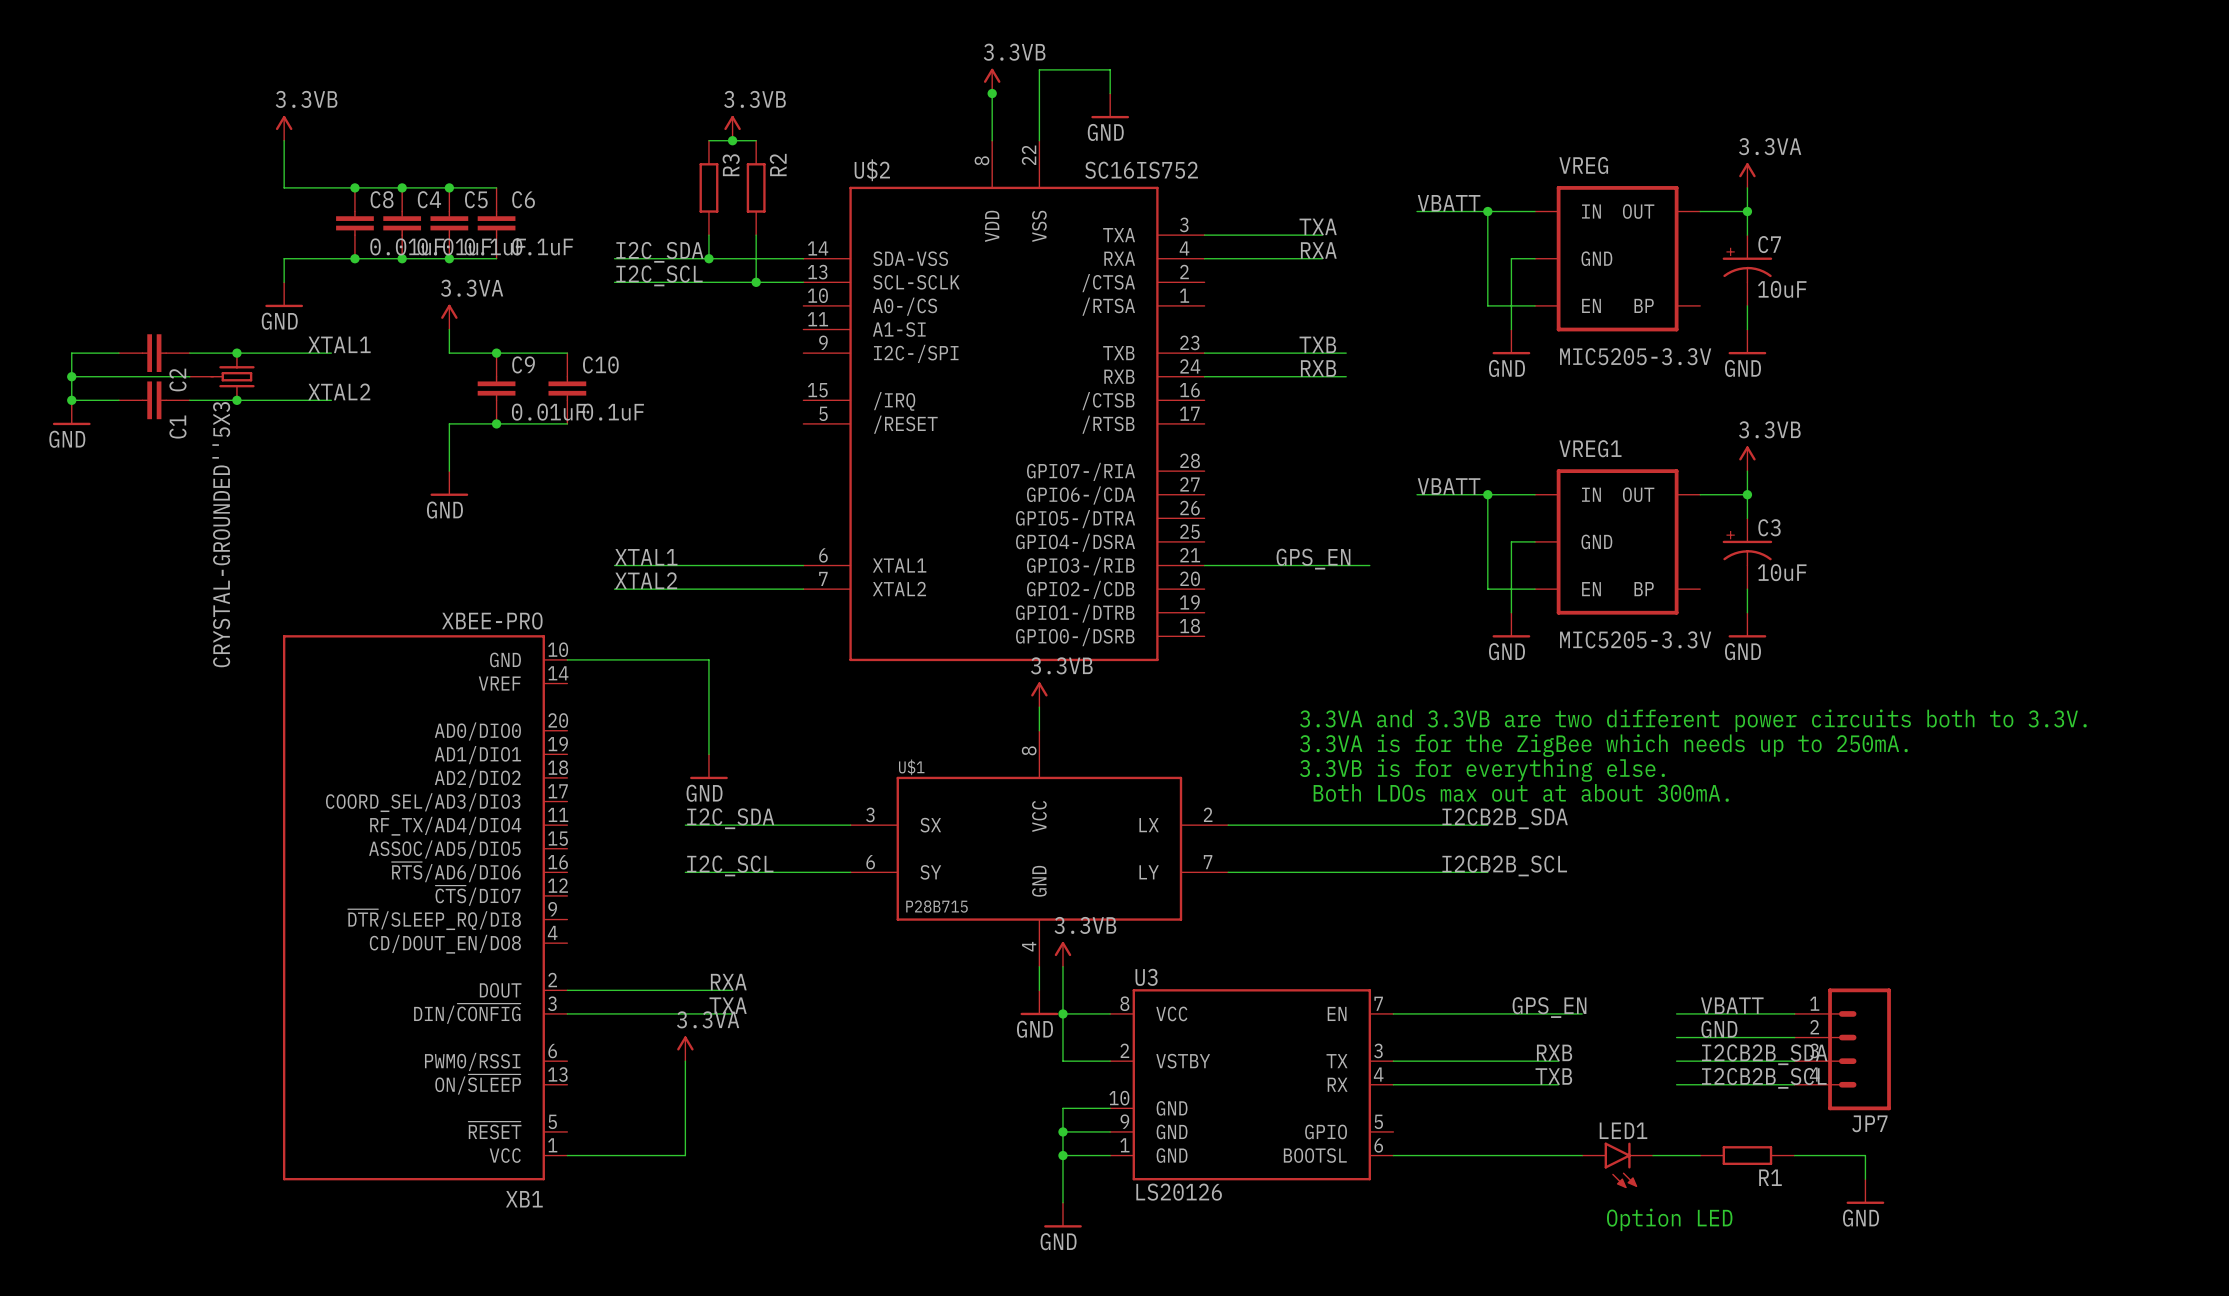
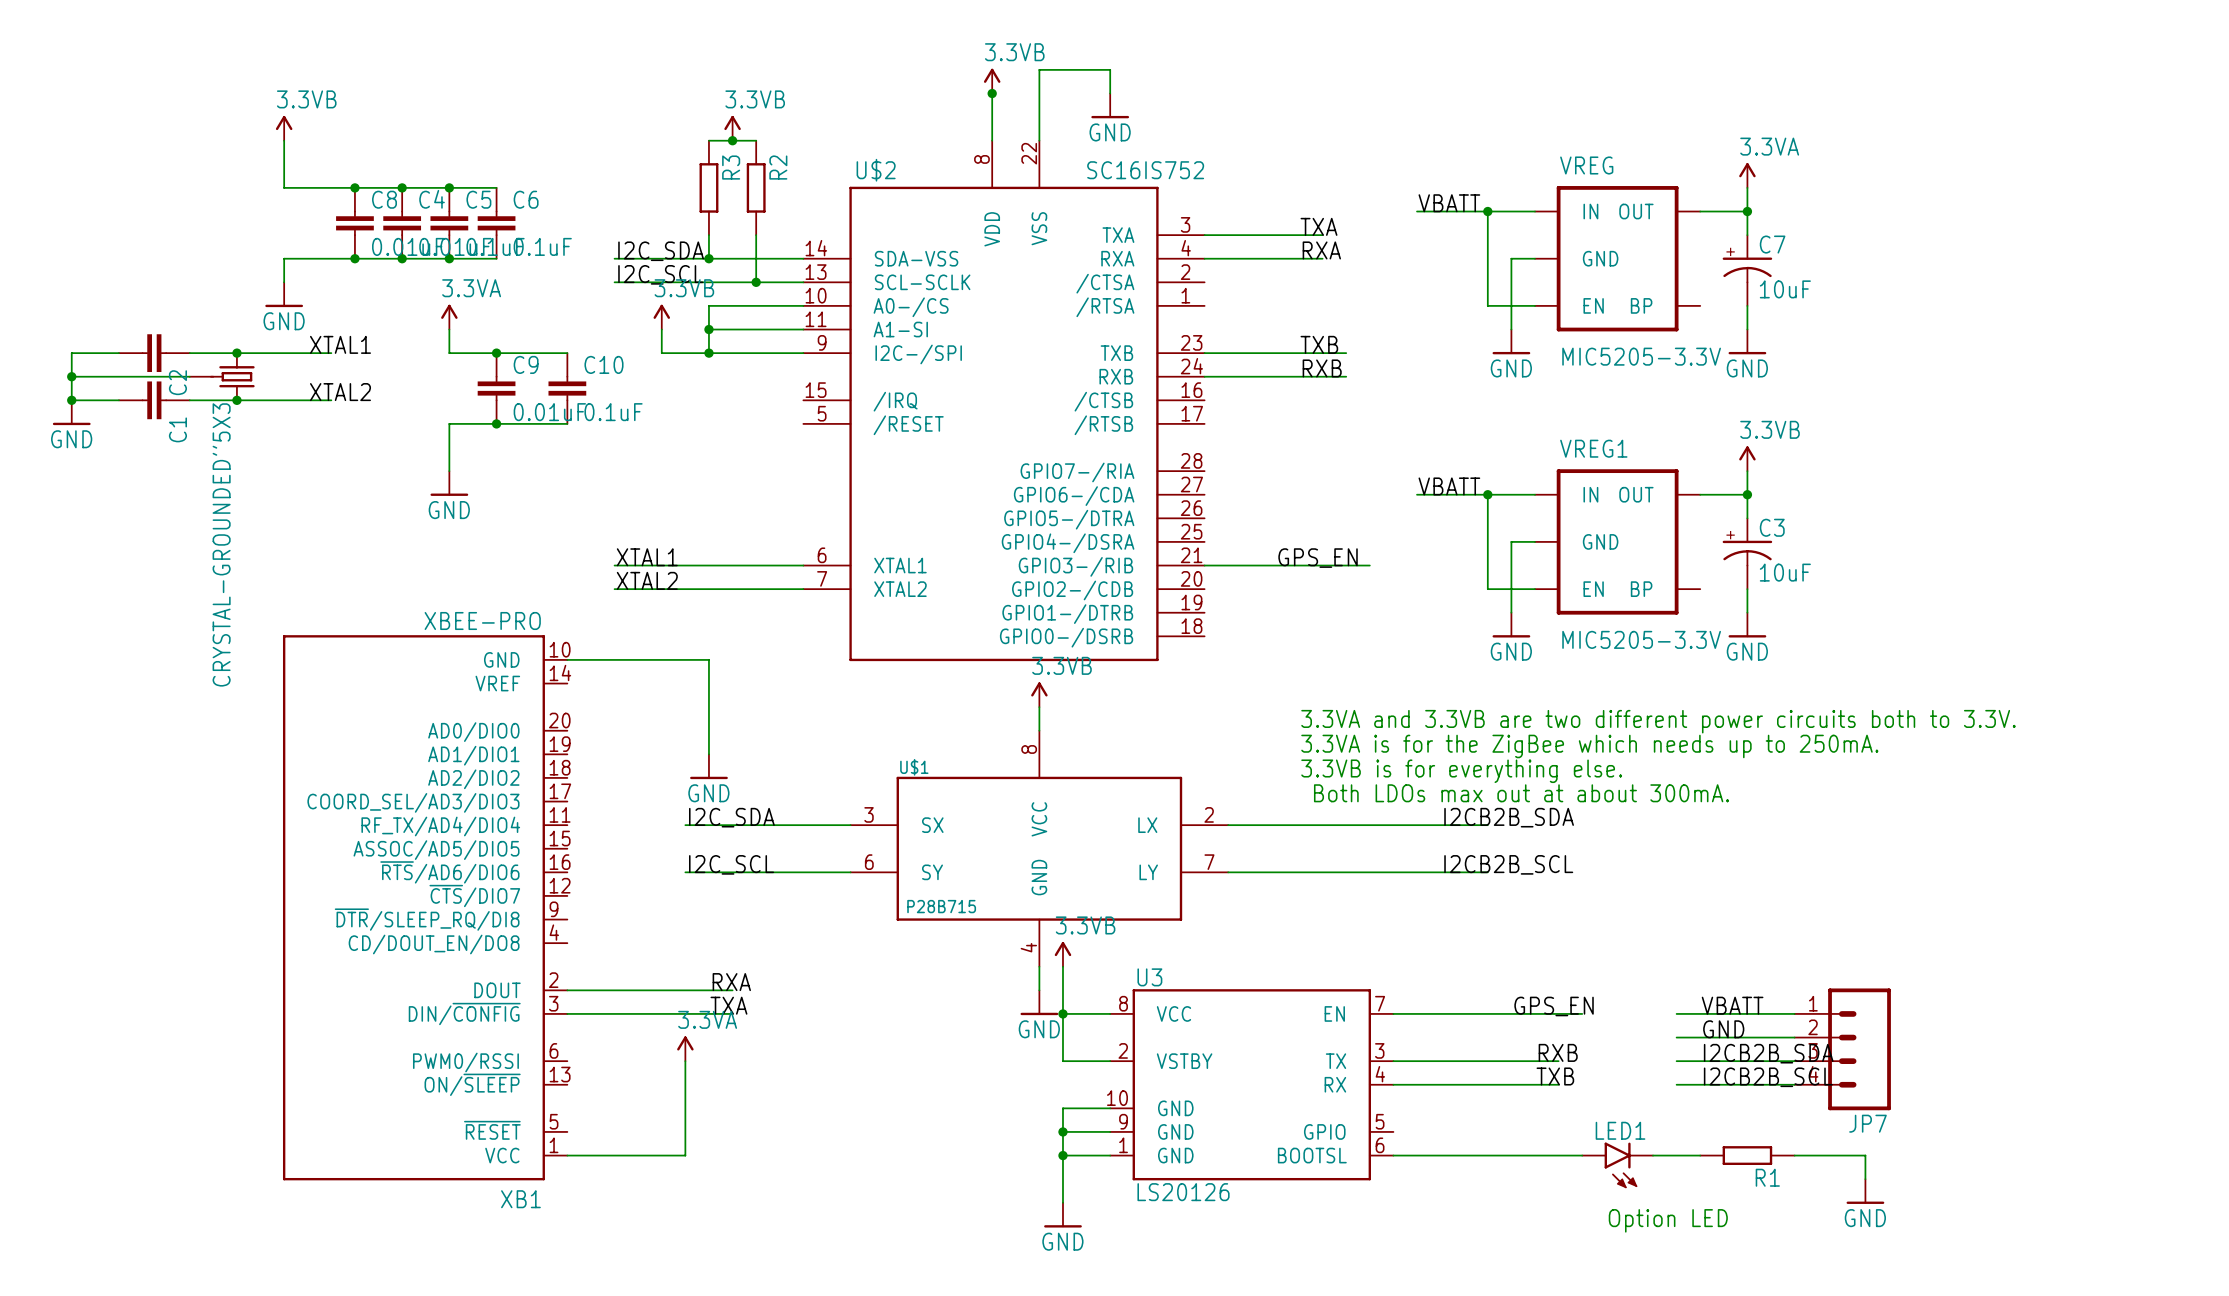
wire: none -> (803, 305) (708, 305) (708, 353)
power symbol: none -> 3.3VB (661, 317)
wire: none -> (661, 329) (661, 353) (803, 353)
wire: none -> (708, 329) (803, 329)
junction: none -> (708, 329)
junction: none -> (708, 353)

